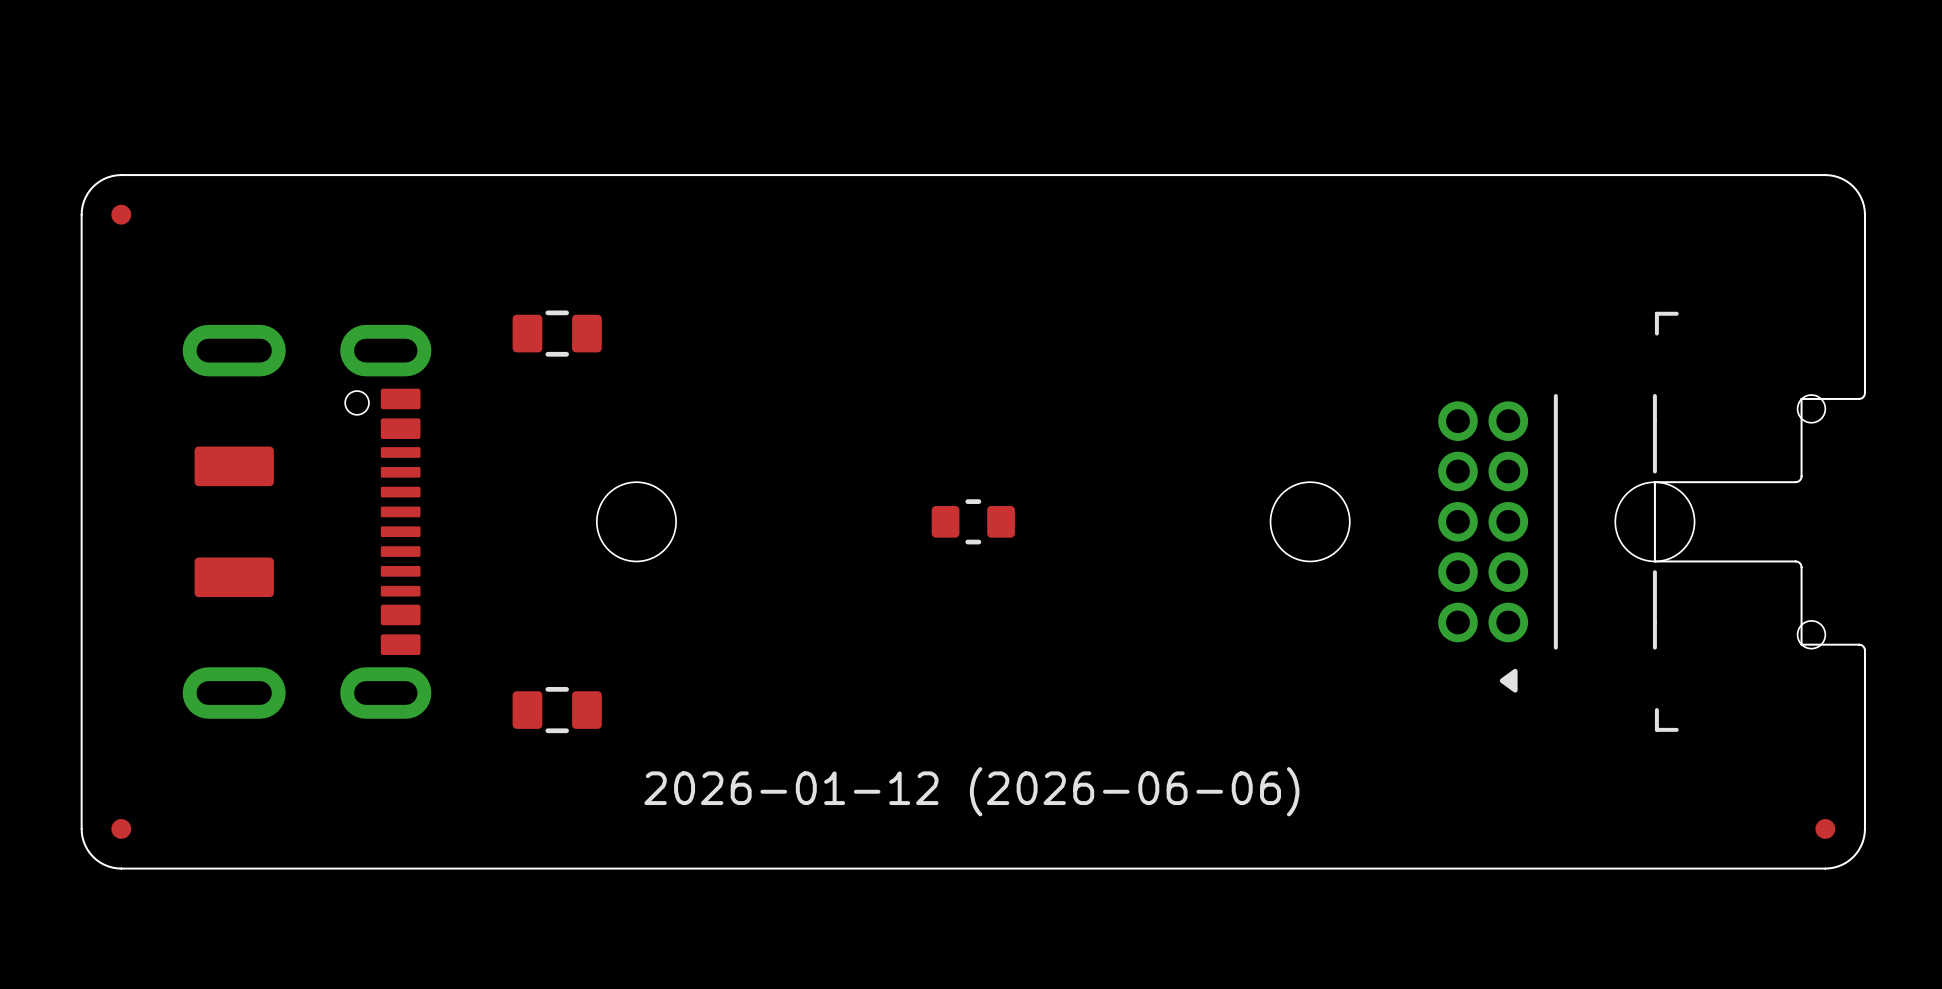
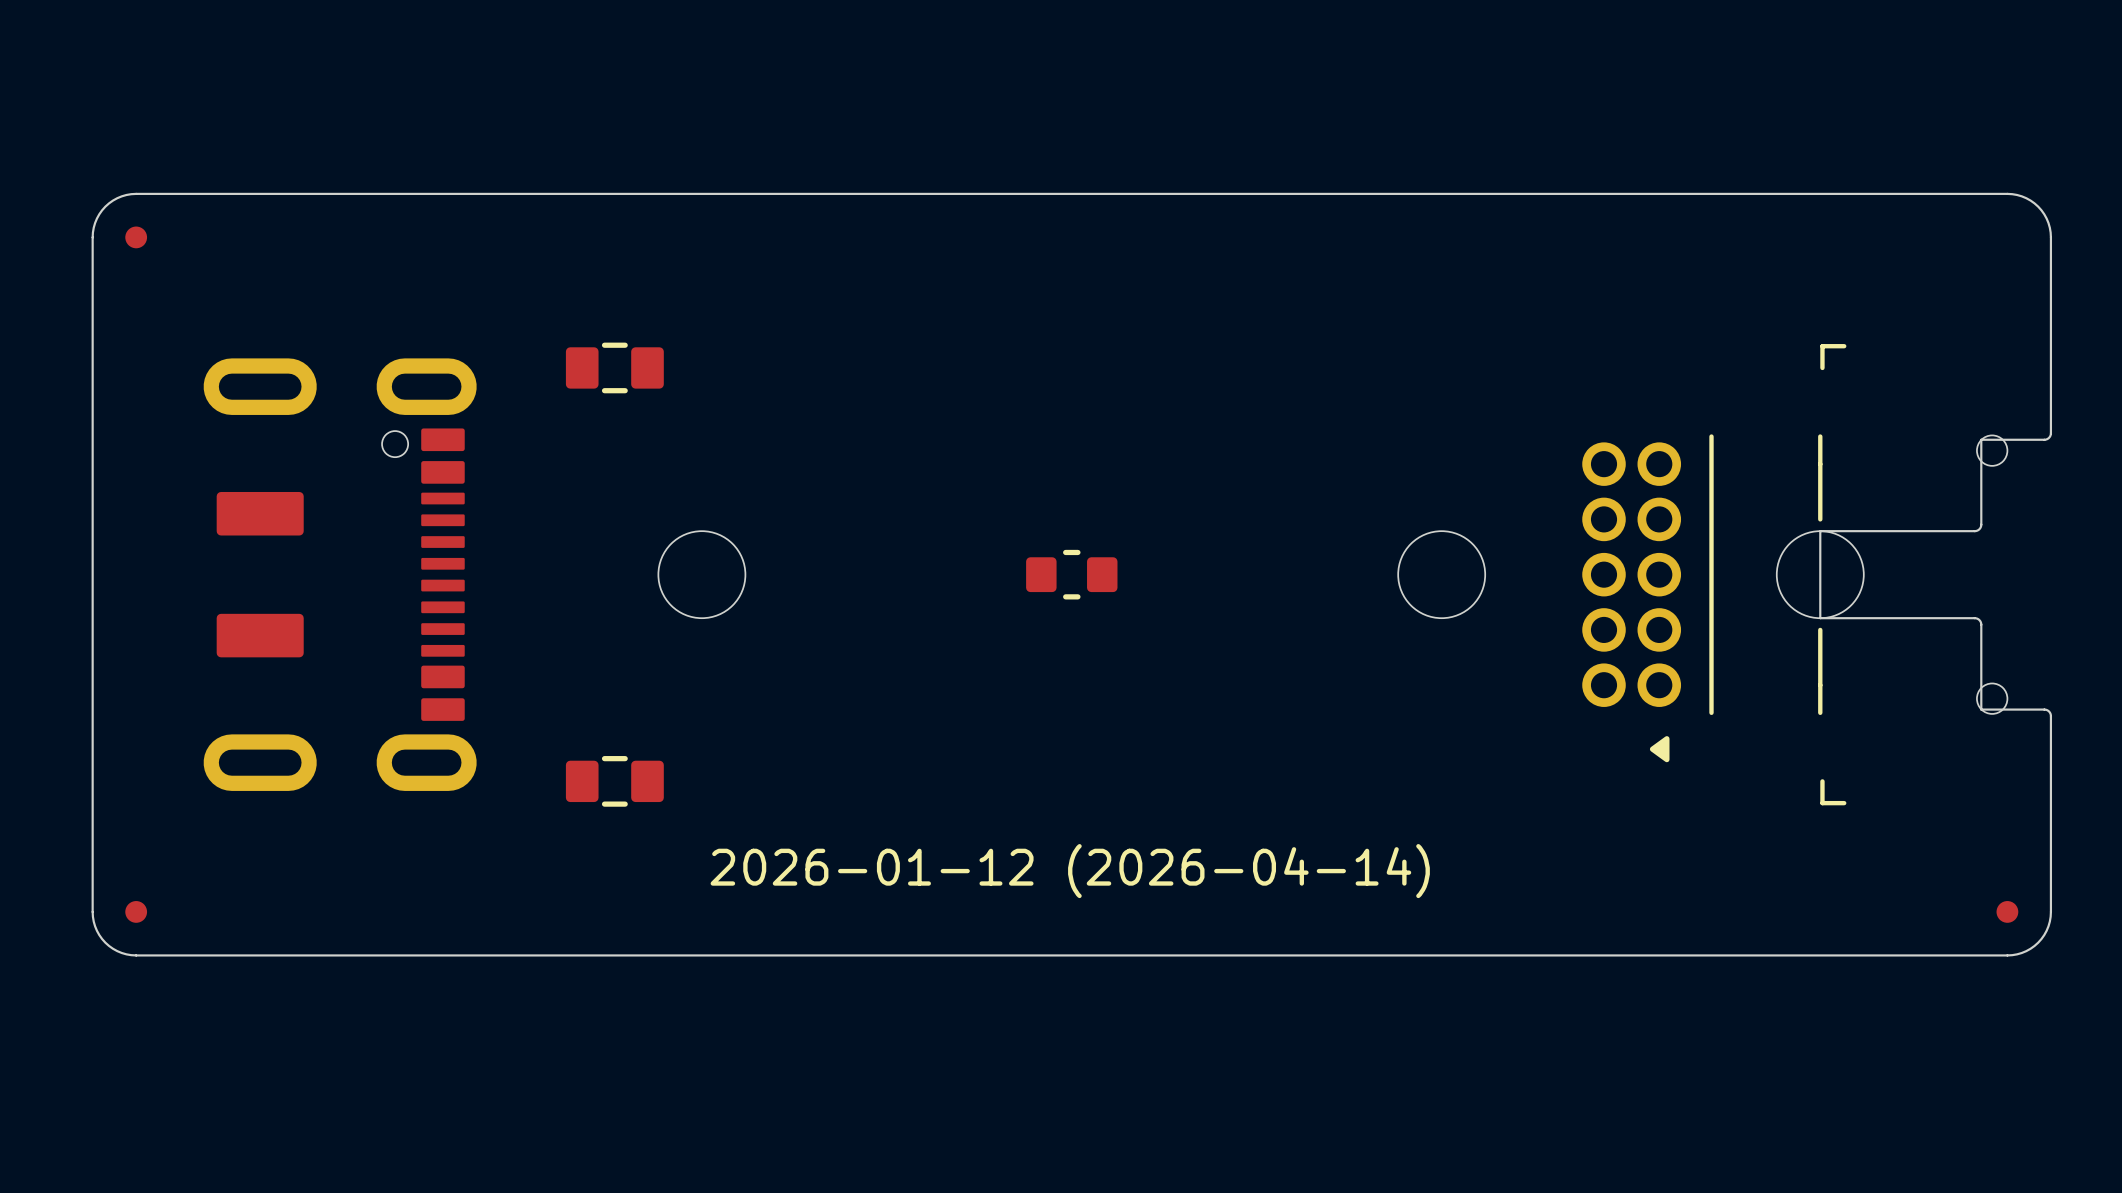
drawing shape: [644, 767, 1300, 817] -> [710, 844, 1430, 899]

